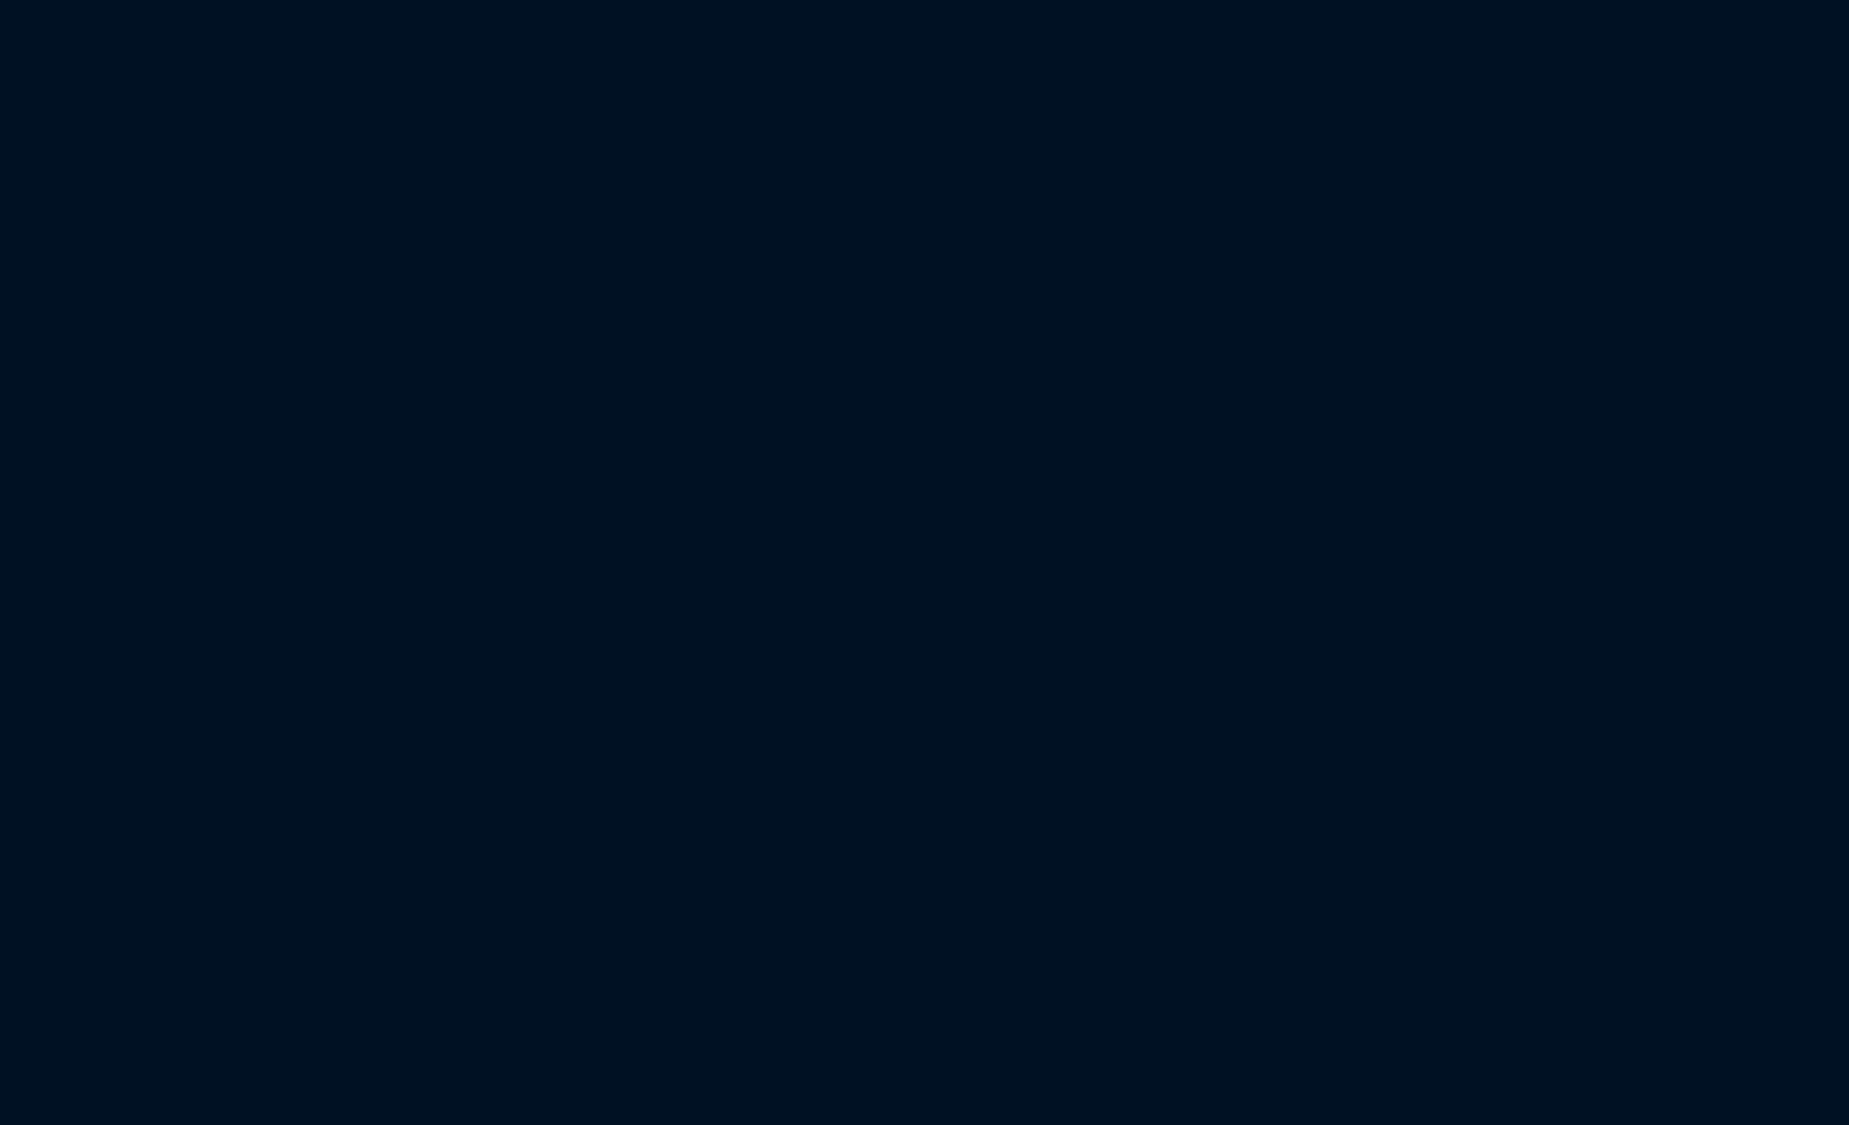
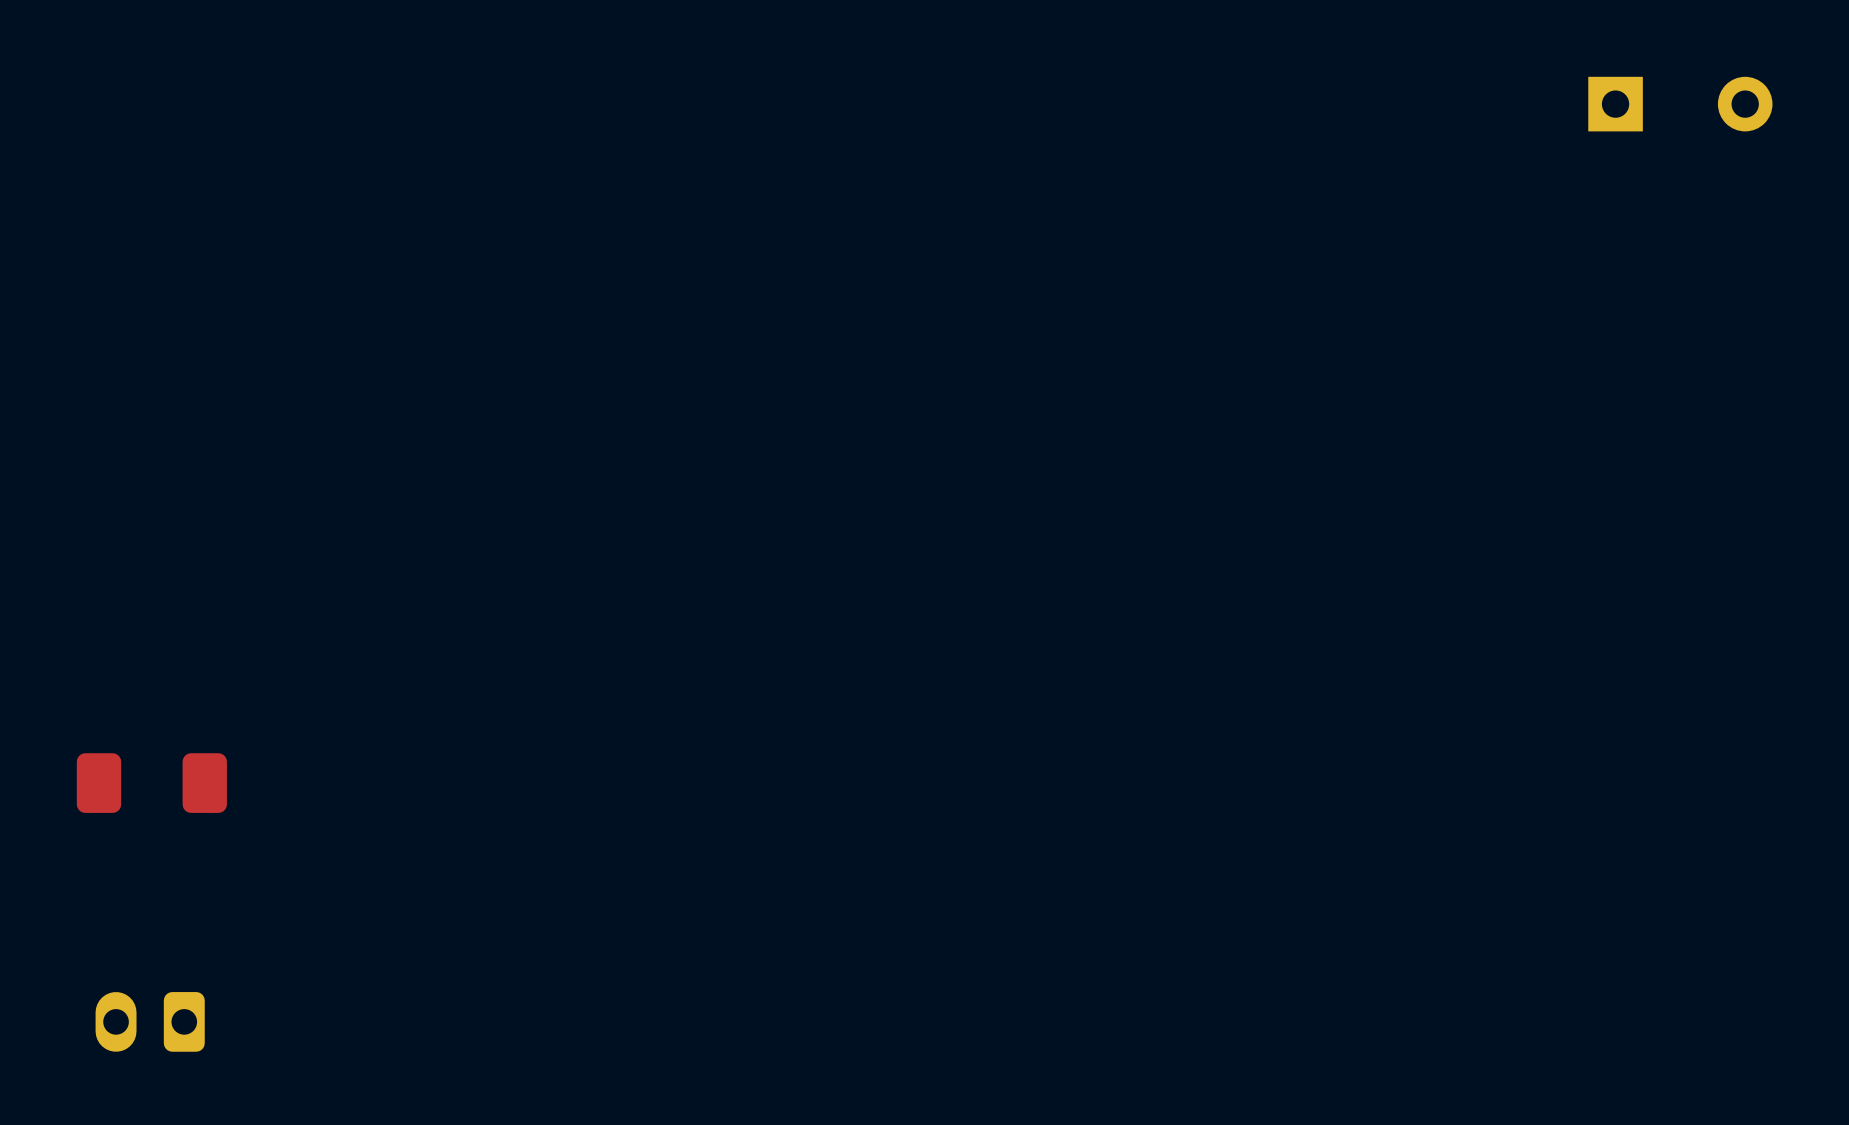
part: none -> (1680, 104)
part: none -> (151, 783)
part: none -> (150, 1021)

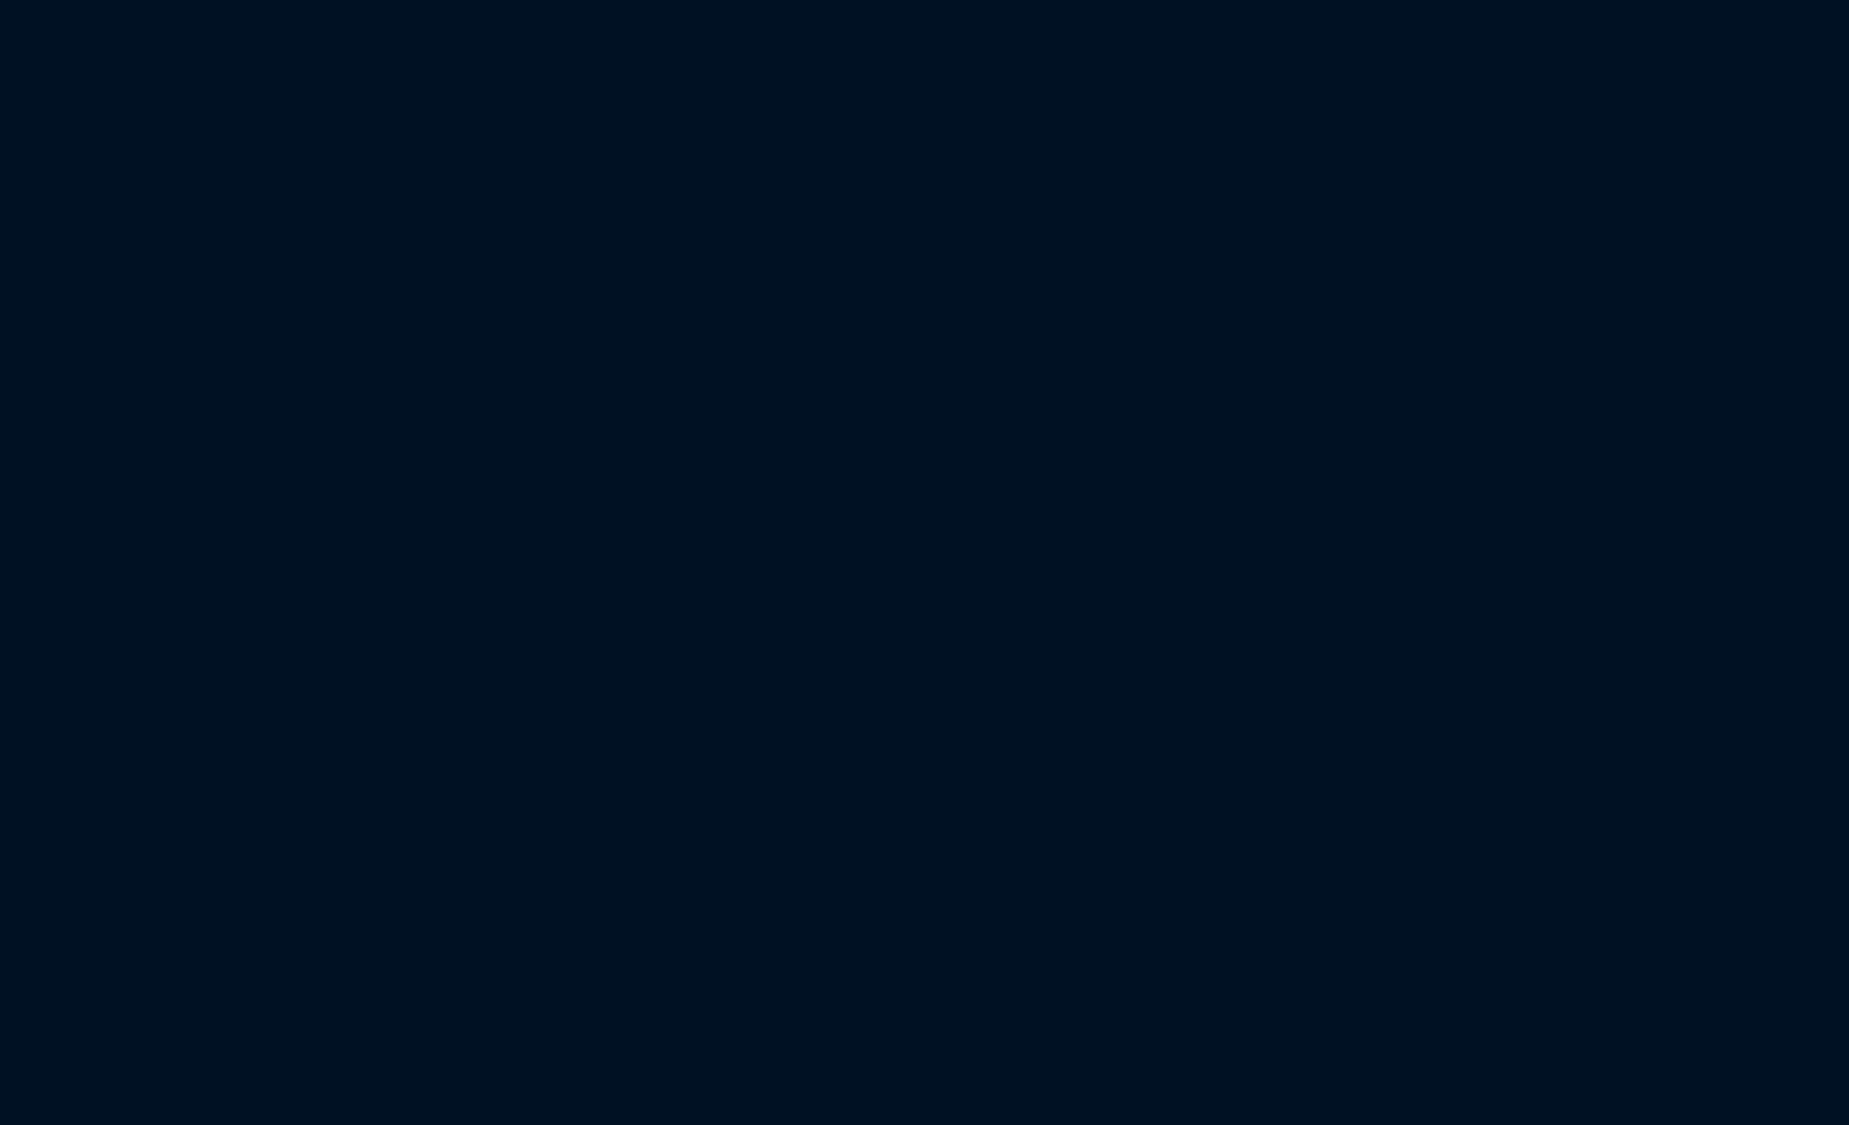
part: (1680, 104) -> none
part: (151, 783) -> none
part: (150, 1021) -> none

